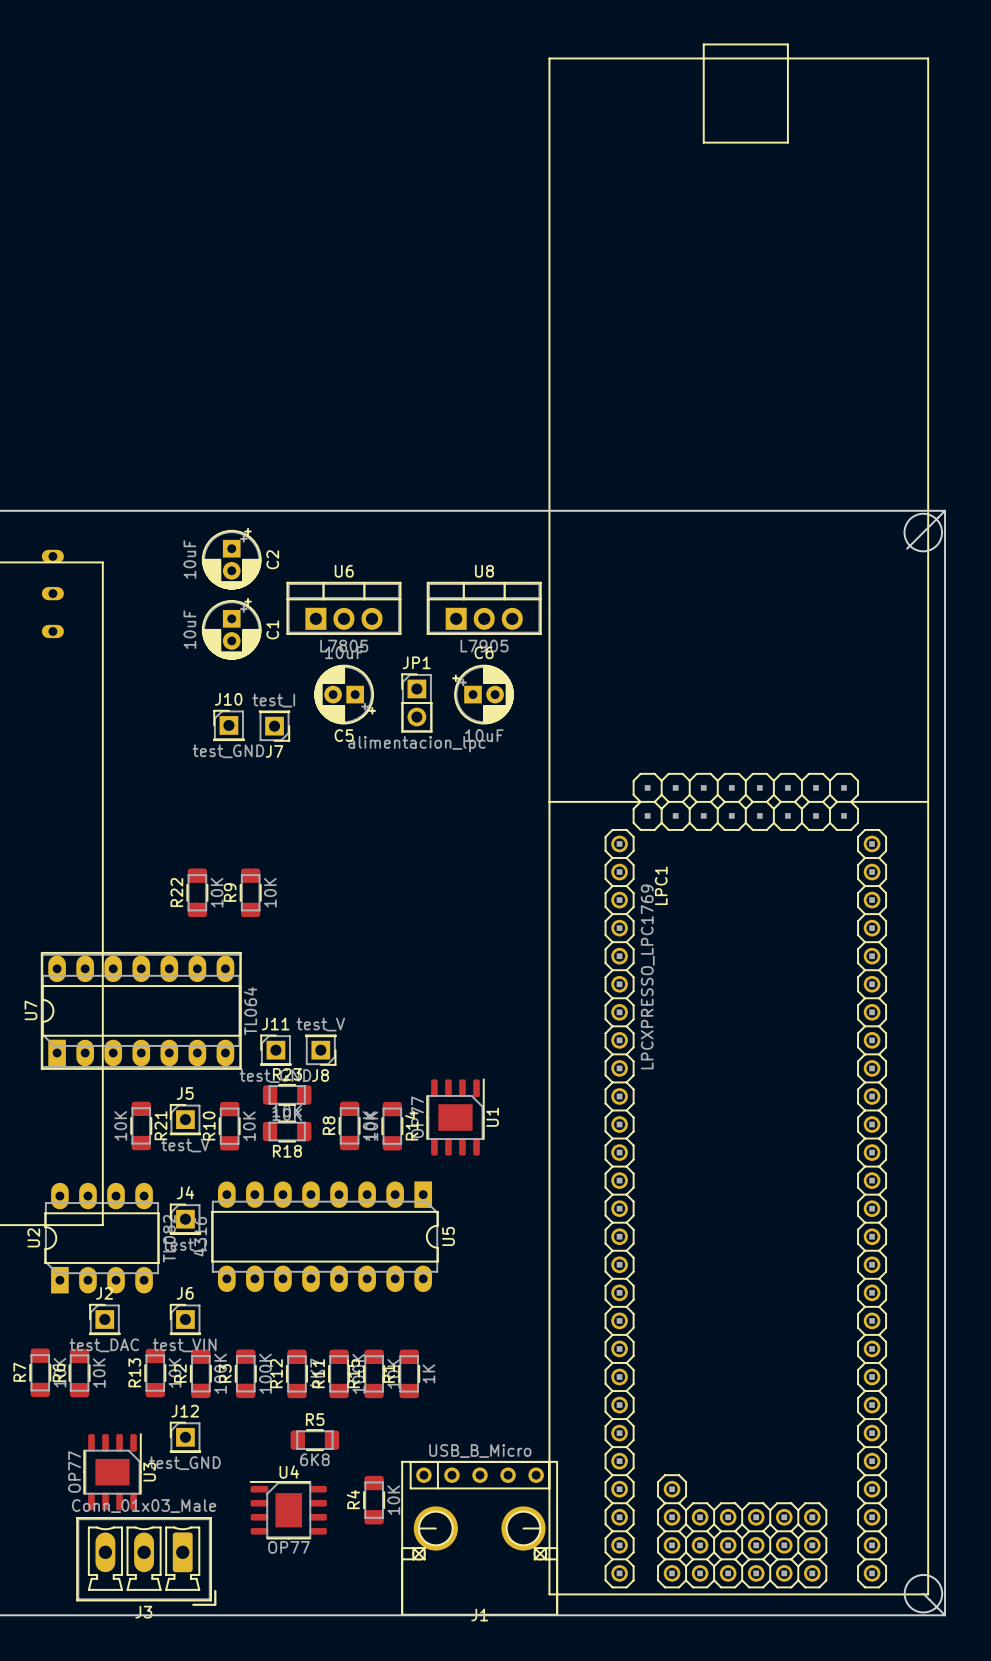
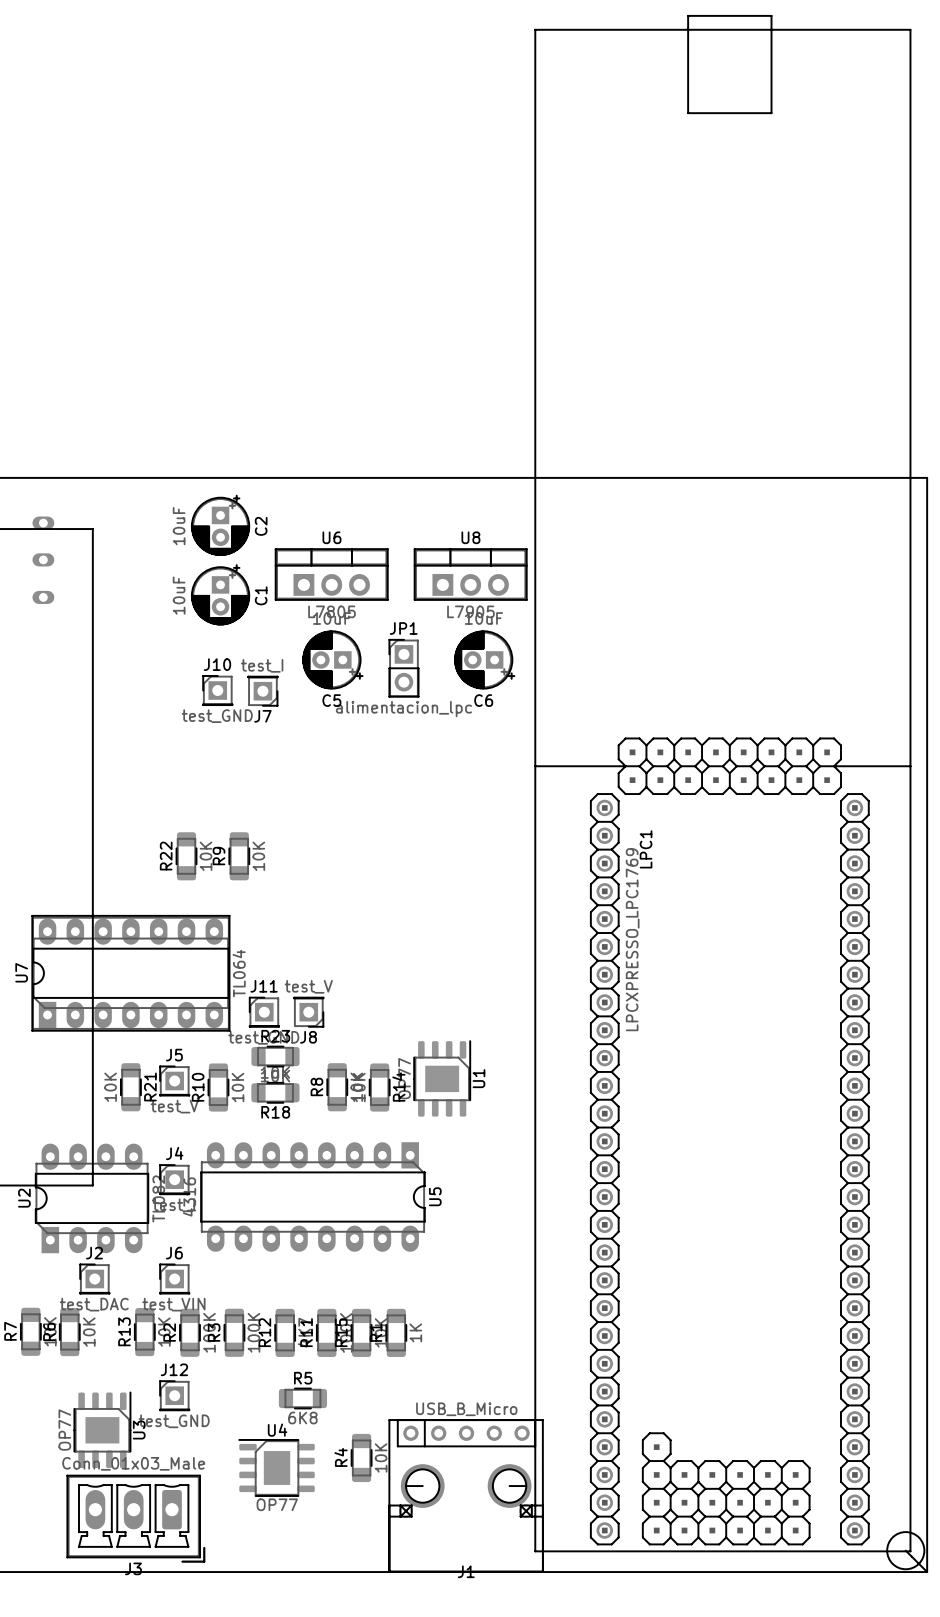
LPC1 footprint: [548, 43, 930, 1596] -> [534, 15, 912, 1553]
board edge: (945, 510) (907, 548) -> none
round board edge: [904, 513, 943, 552] -> none
C6 rotation: 0° (483, 694) -> 180° (484, 659)

